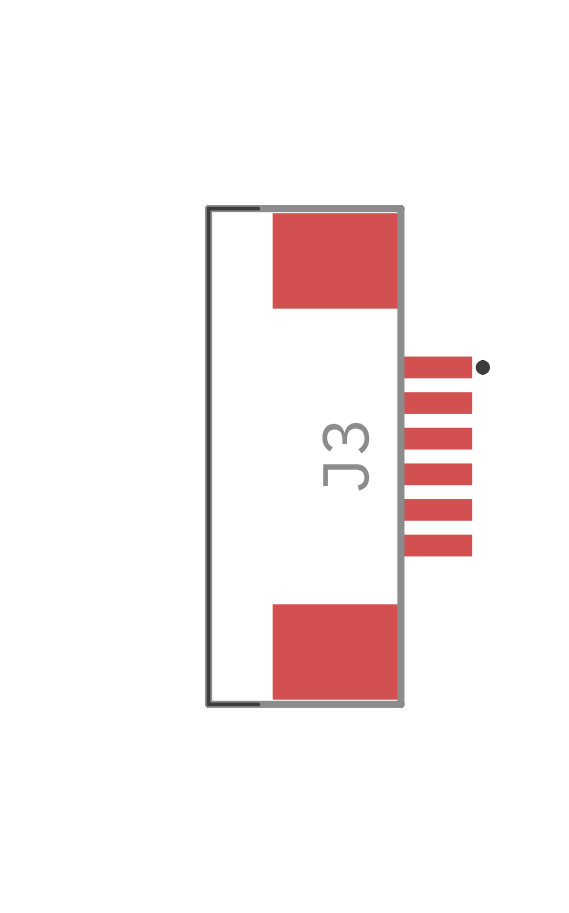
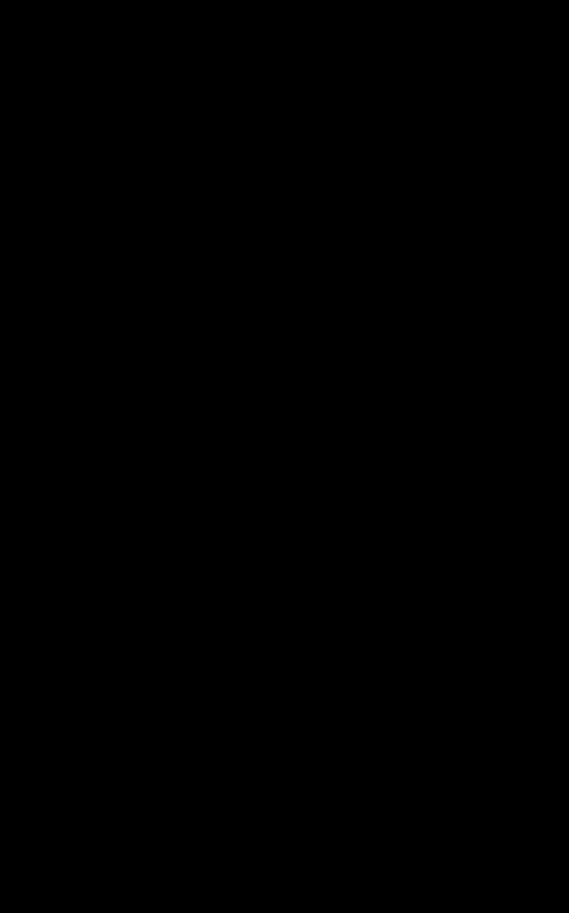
J3: (347, 456) -> none

